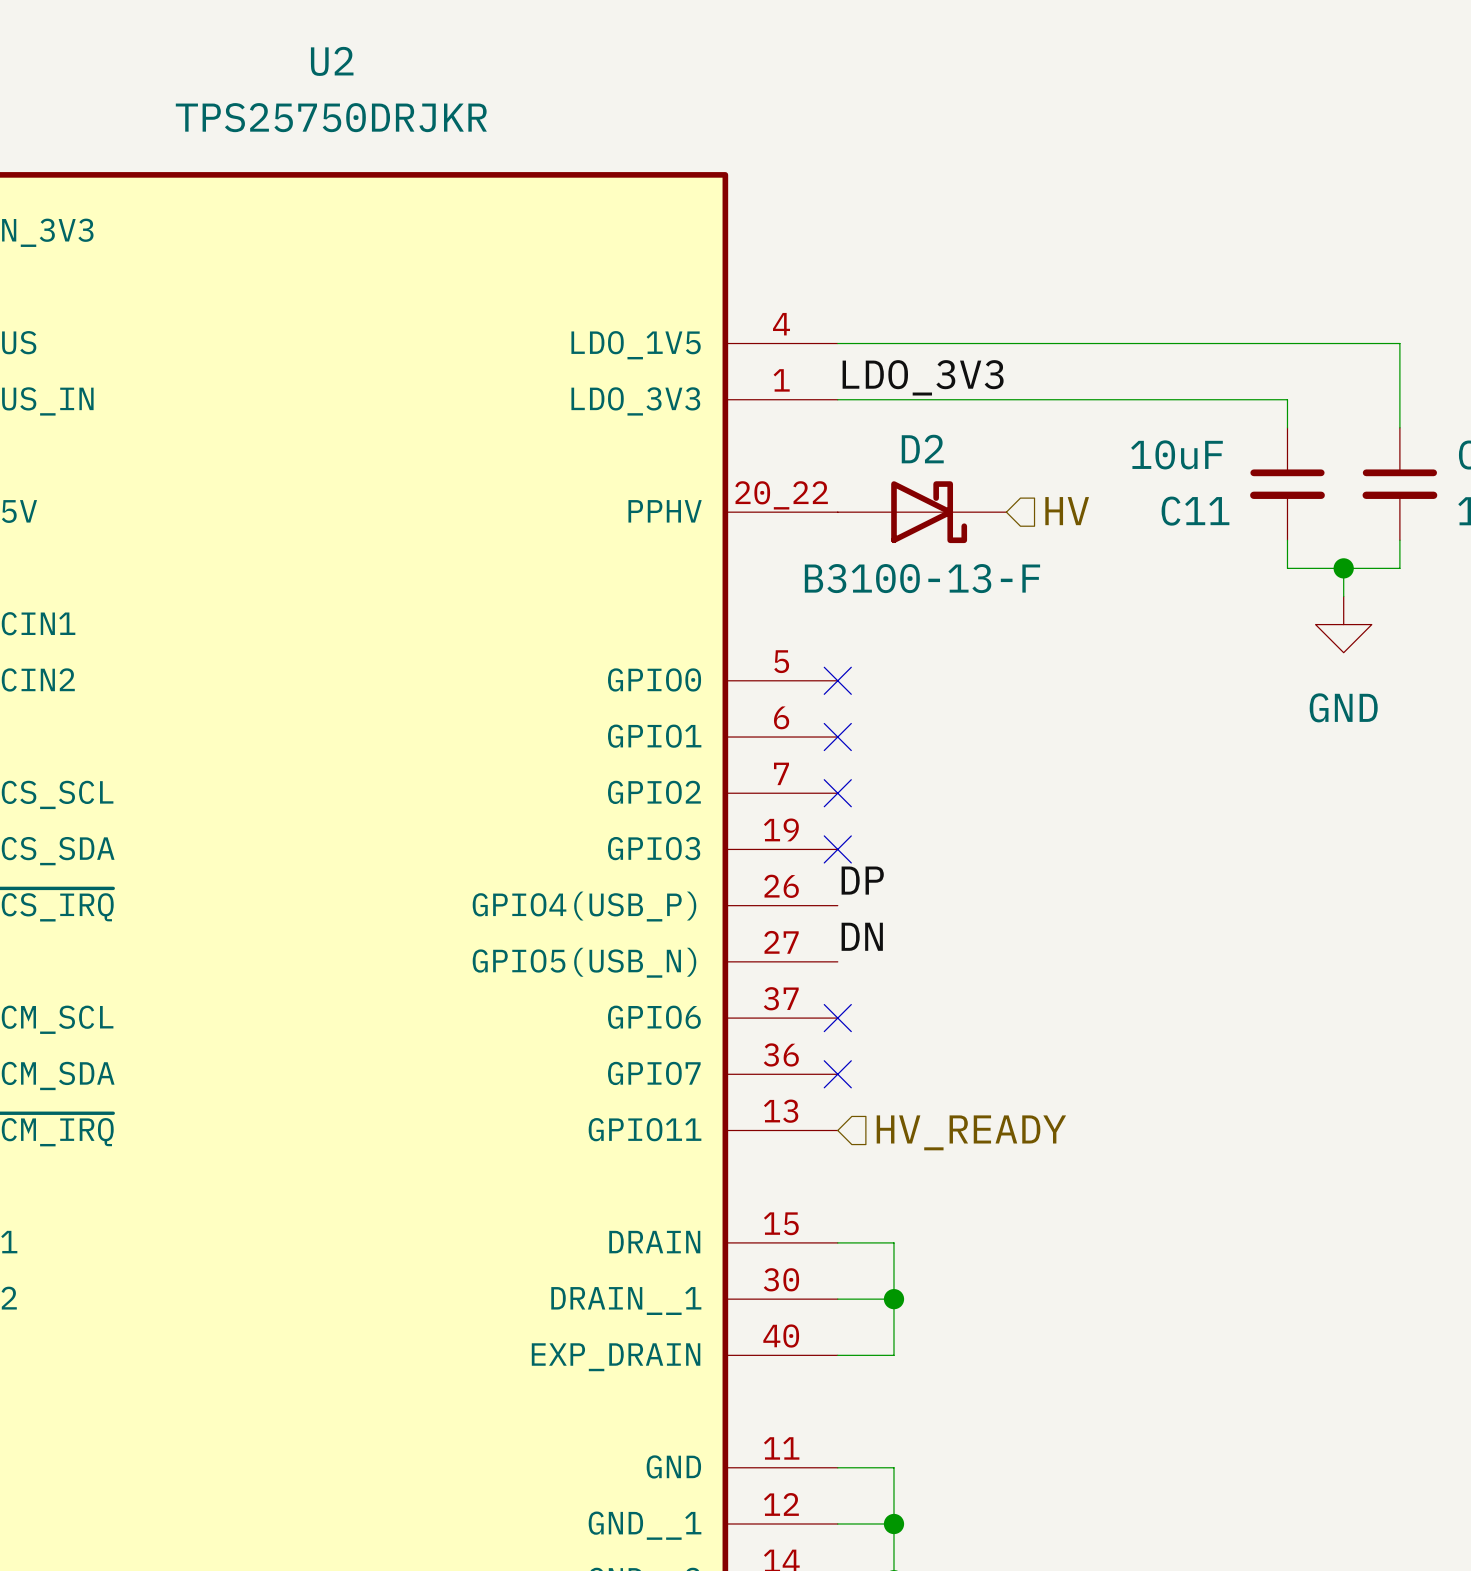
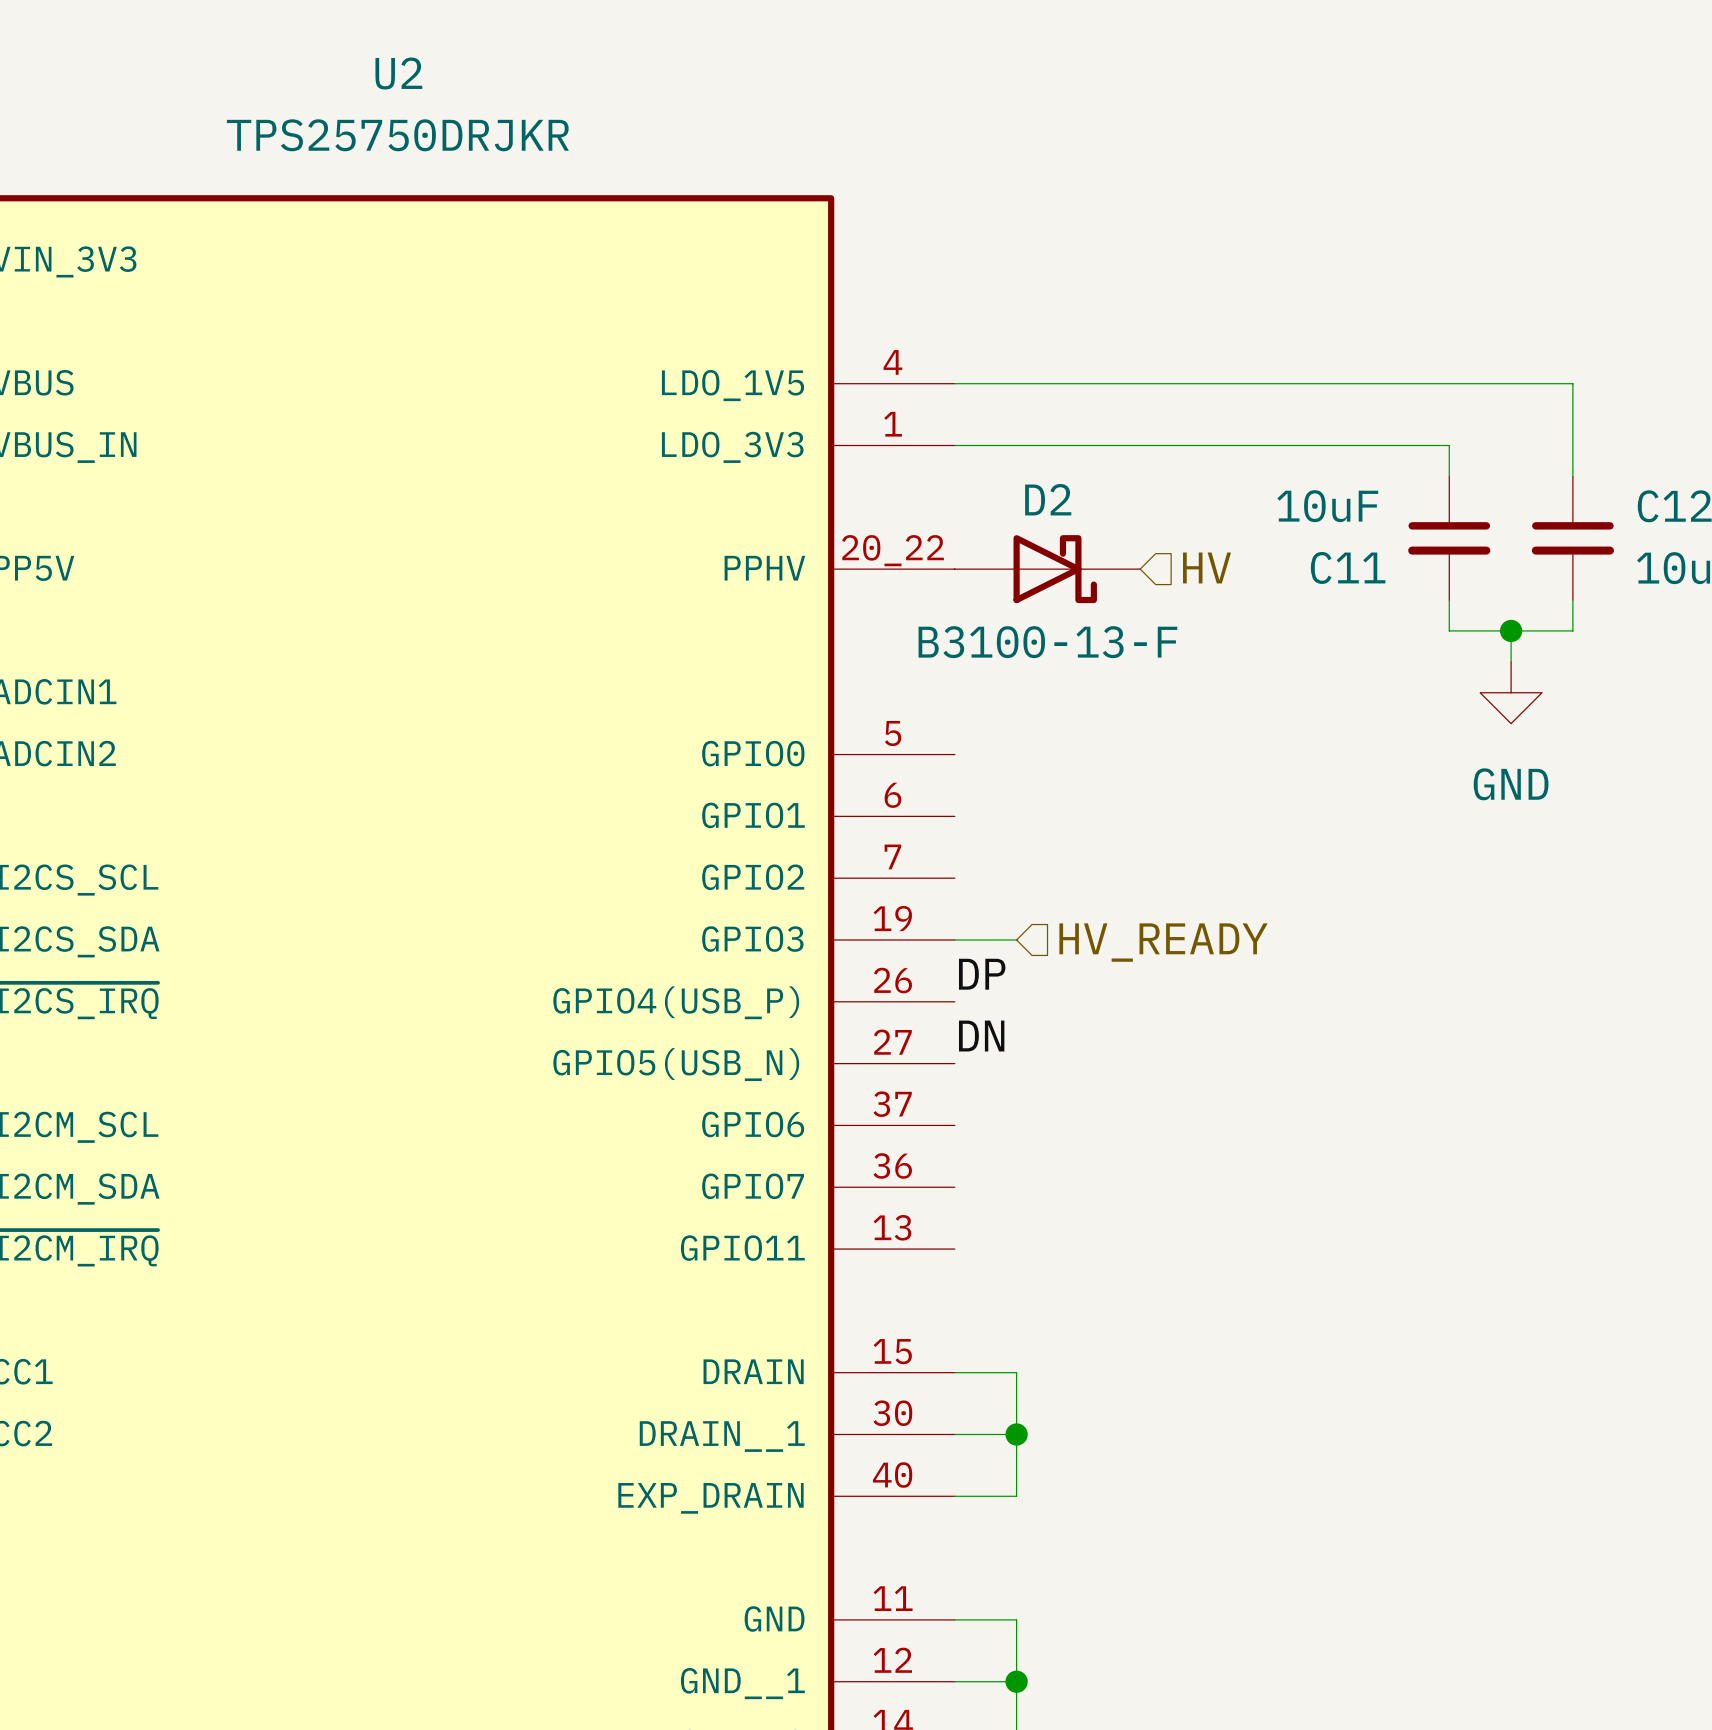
label: LDO_3V3 (923, 377) -> none
no-connect mark: (837, 680) -> none
no-connect mark: (837, 737) -> none
no-connect mark: (837, 793) -> none
wire: none -> (954, 939) (1016, 939)
no-connect mark: (837, 849) -> none
no-connect mark: (837, 1018) -> none
no-connect mark: (837, 1074) -> none
hierarchical label position: HV_READY (971, 1132) -> HV_READY (1163, 942)

